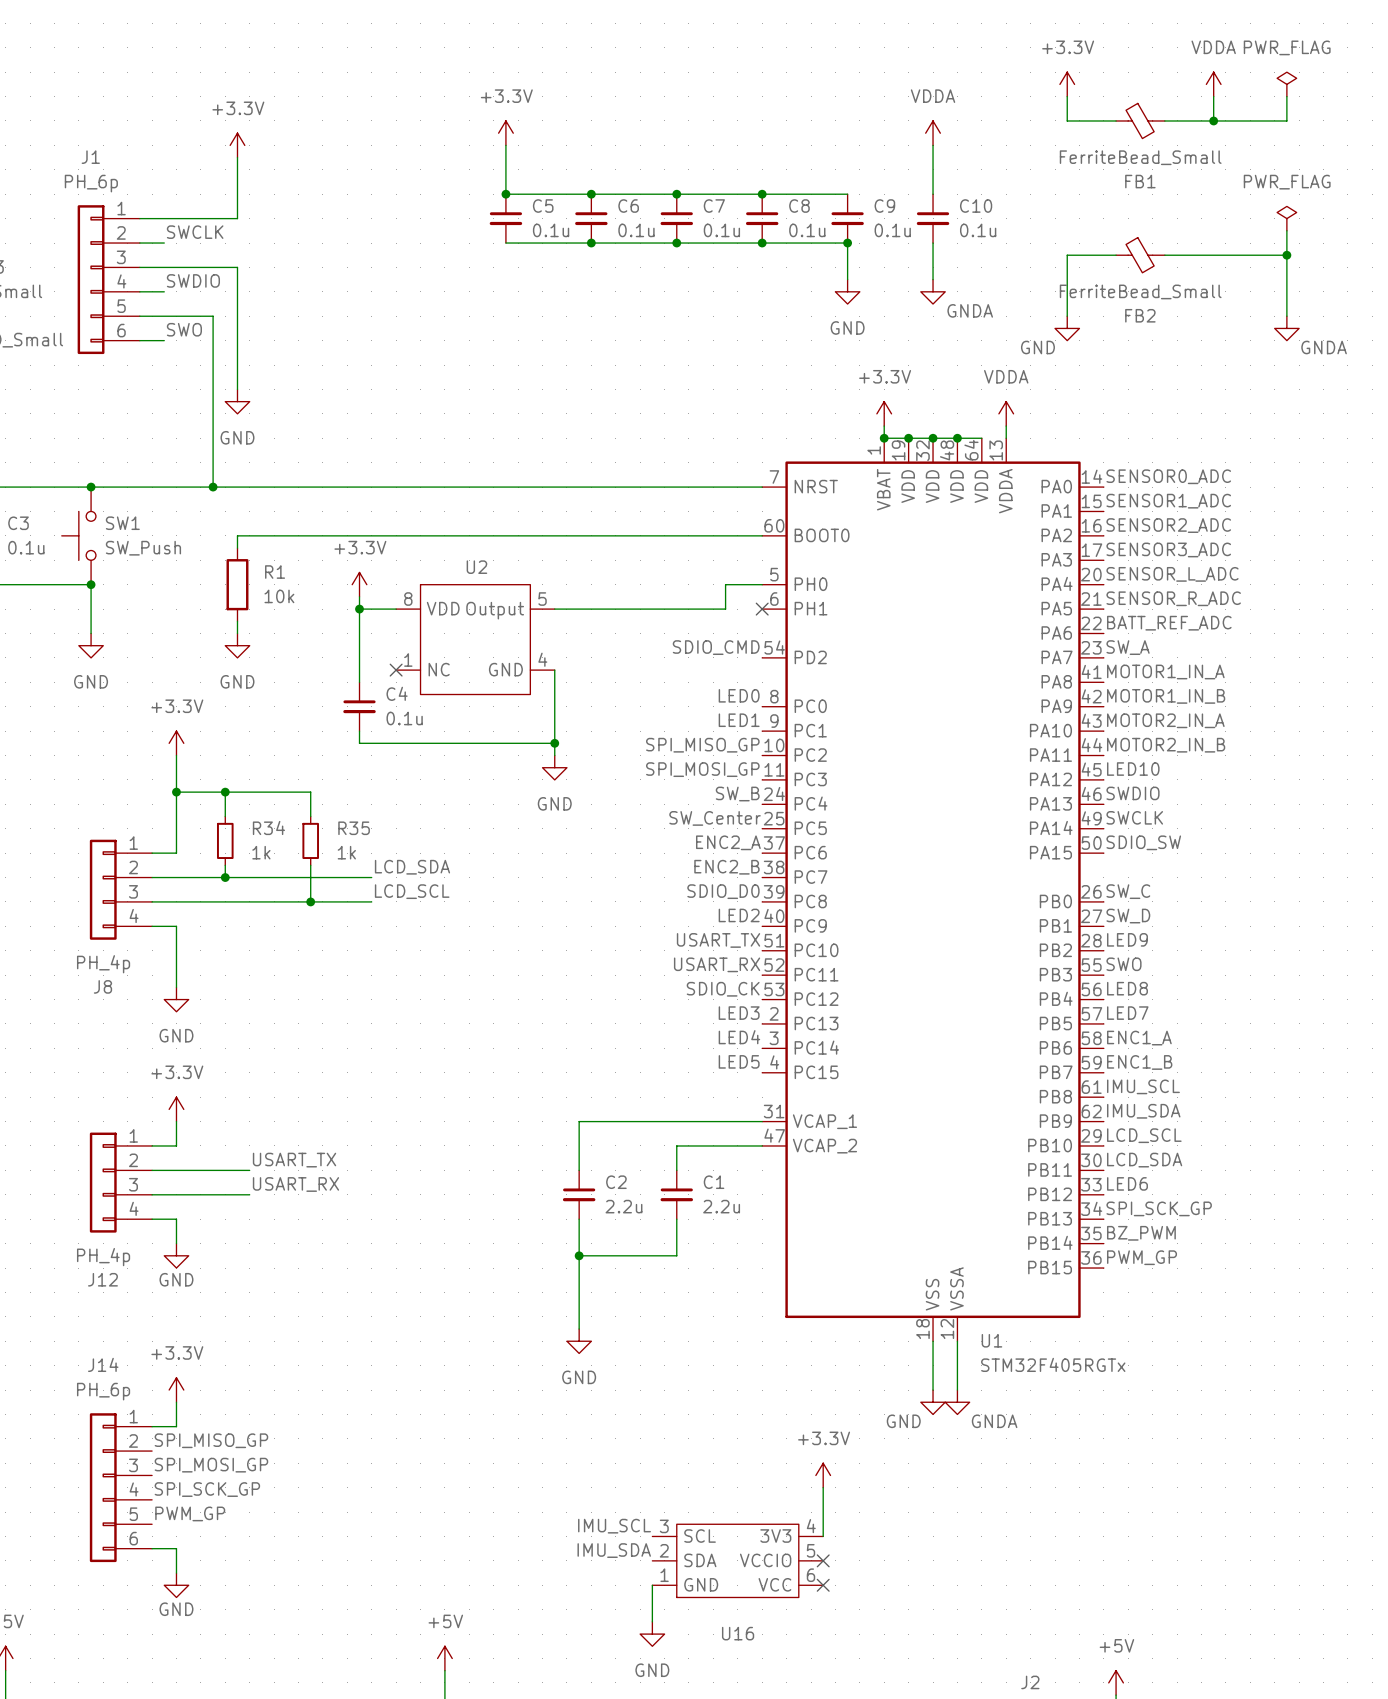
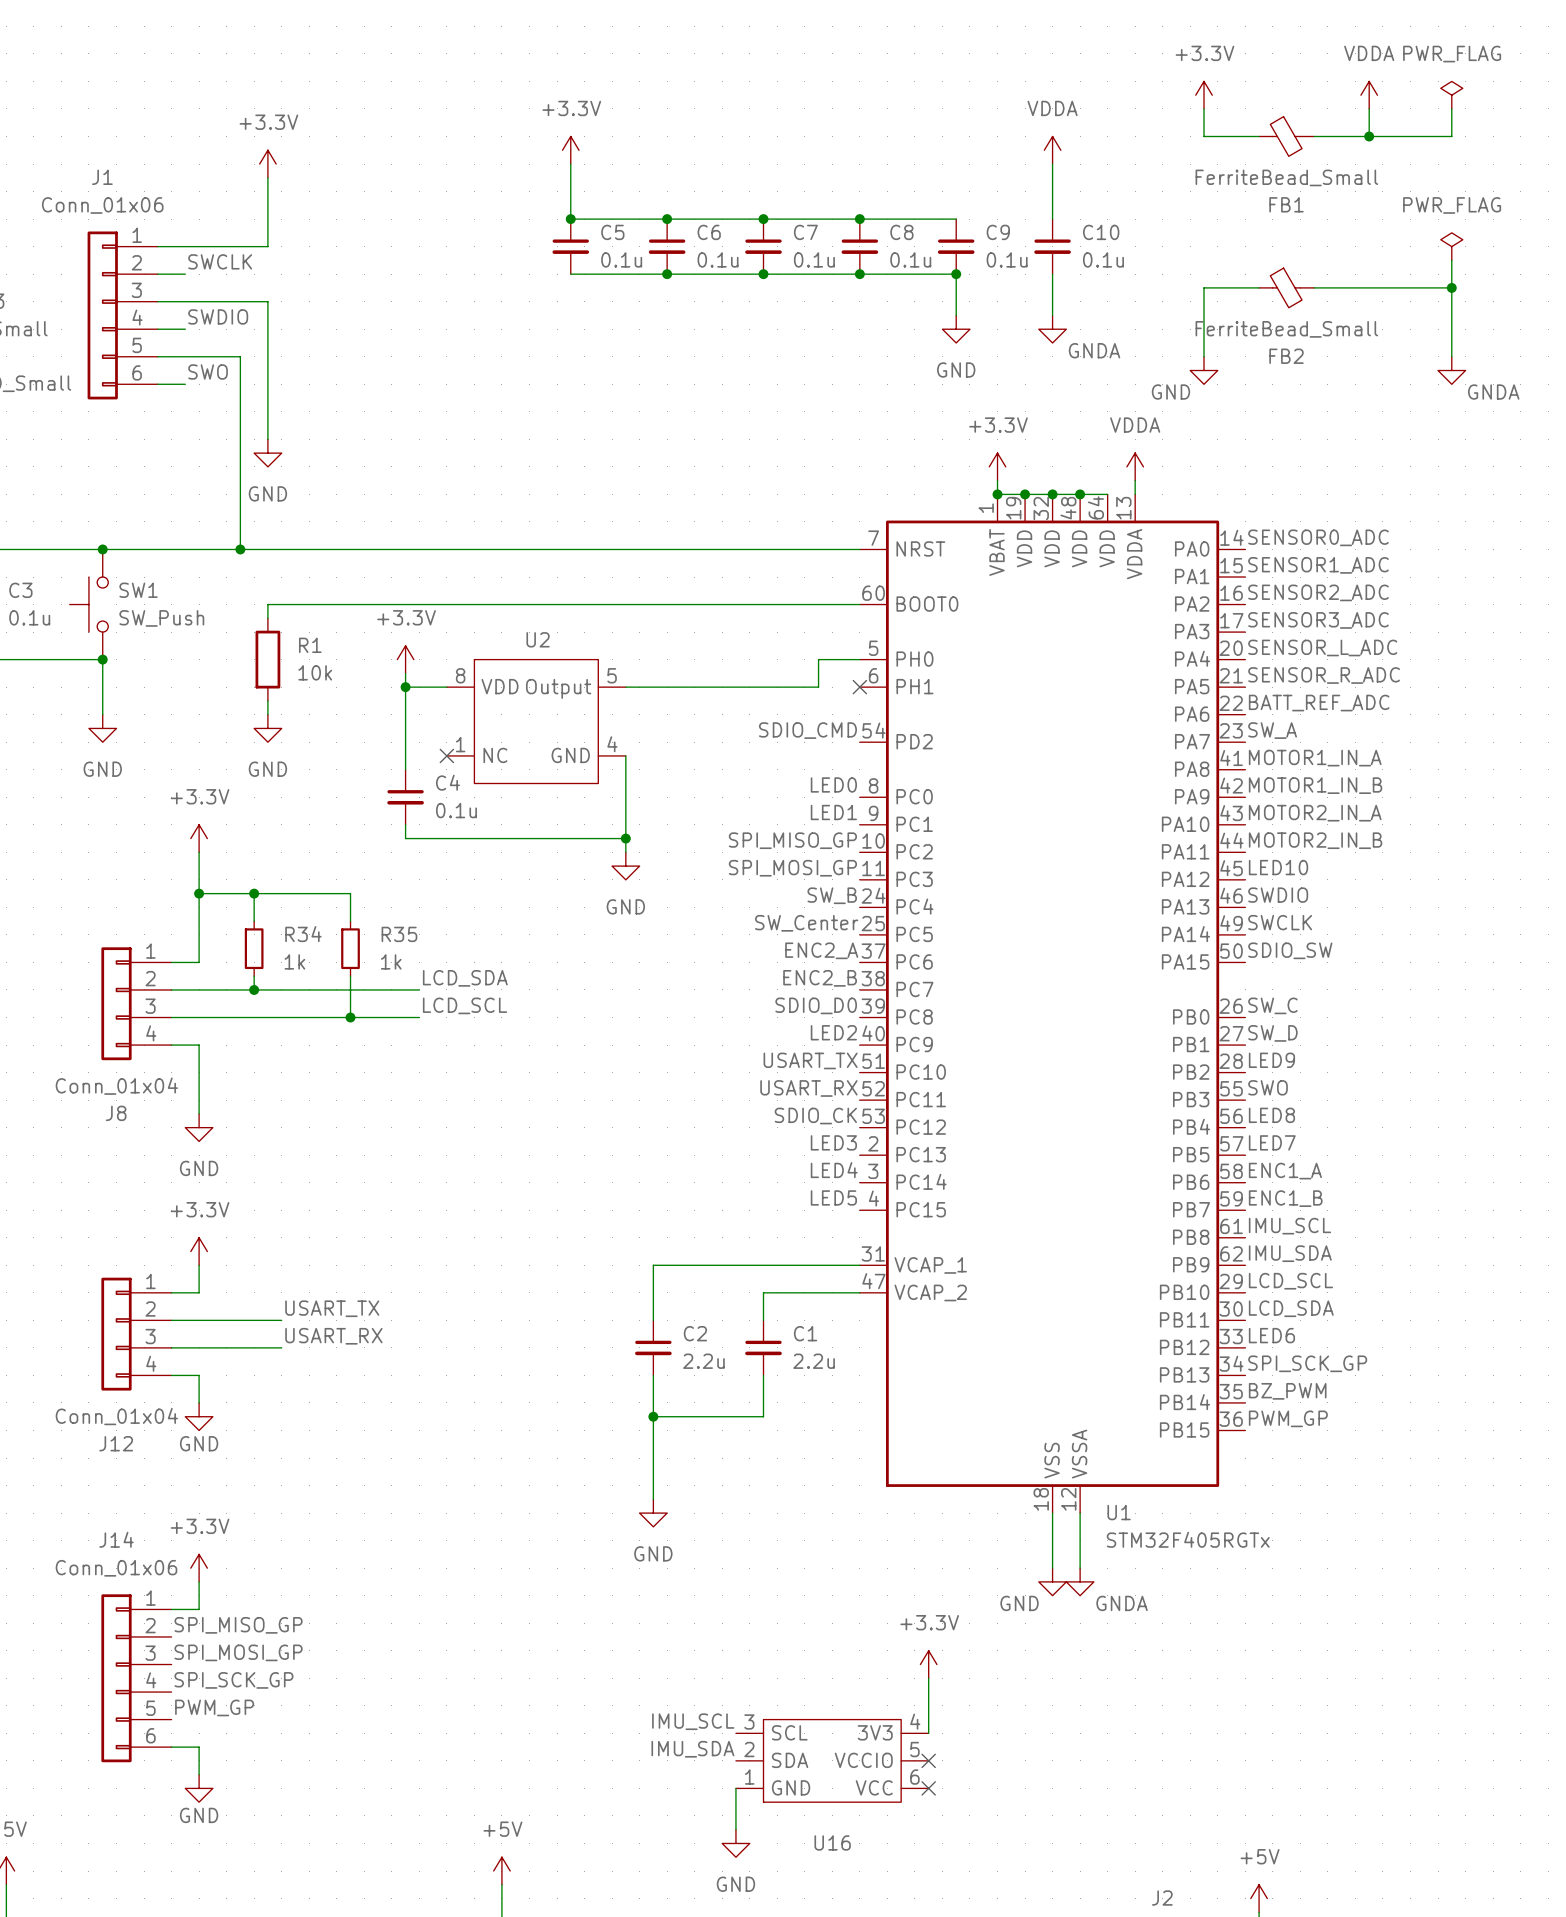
J1 value: PH_6p (91, 183) -> Conn_01x06 (102, 205)
J8 value: PH_4p (103, 964) -> Conn_01x04 (116, 1086)
J12 value: PH_4p (103, 1257) -> Conn_01x04 (116, 1416)
J14 value: PH_6p (103, 1391) -> Conn_01x06 (116, 1568)

